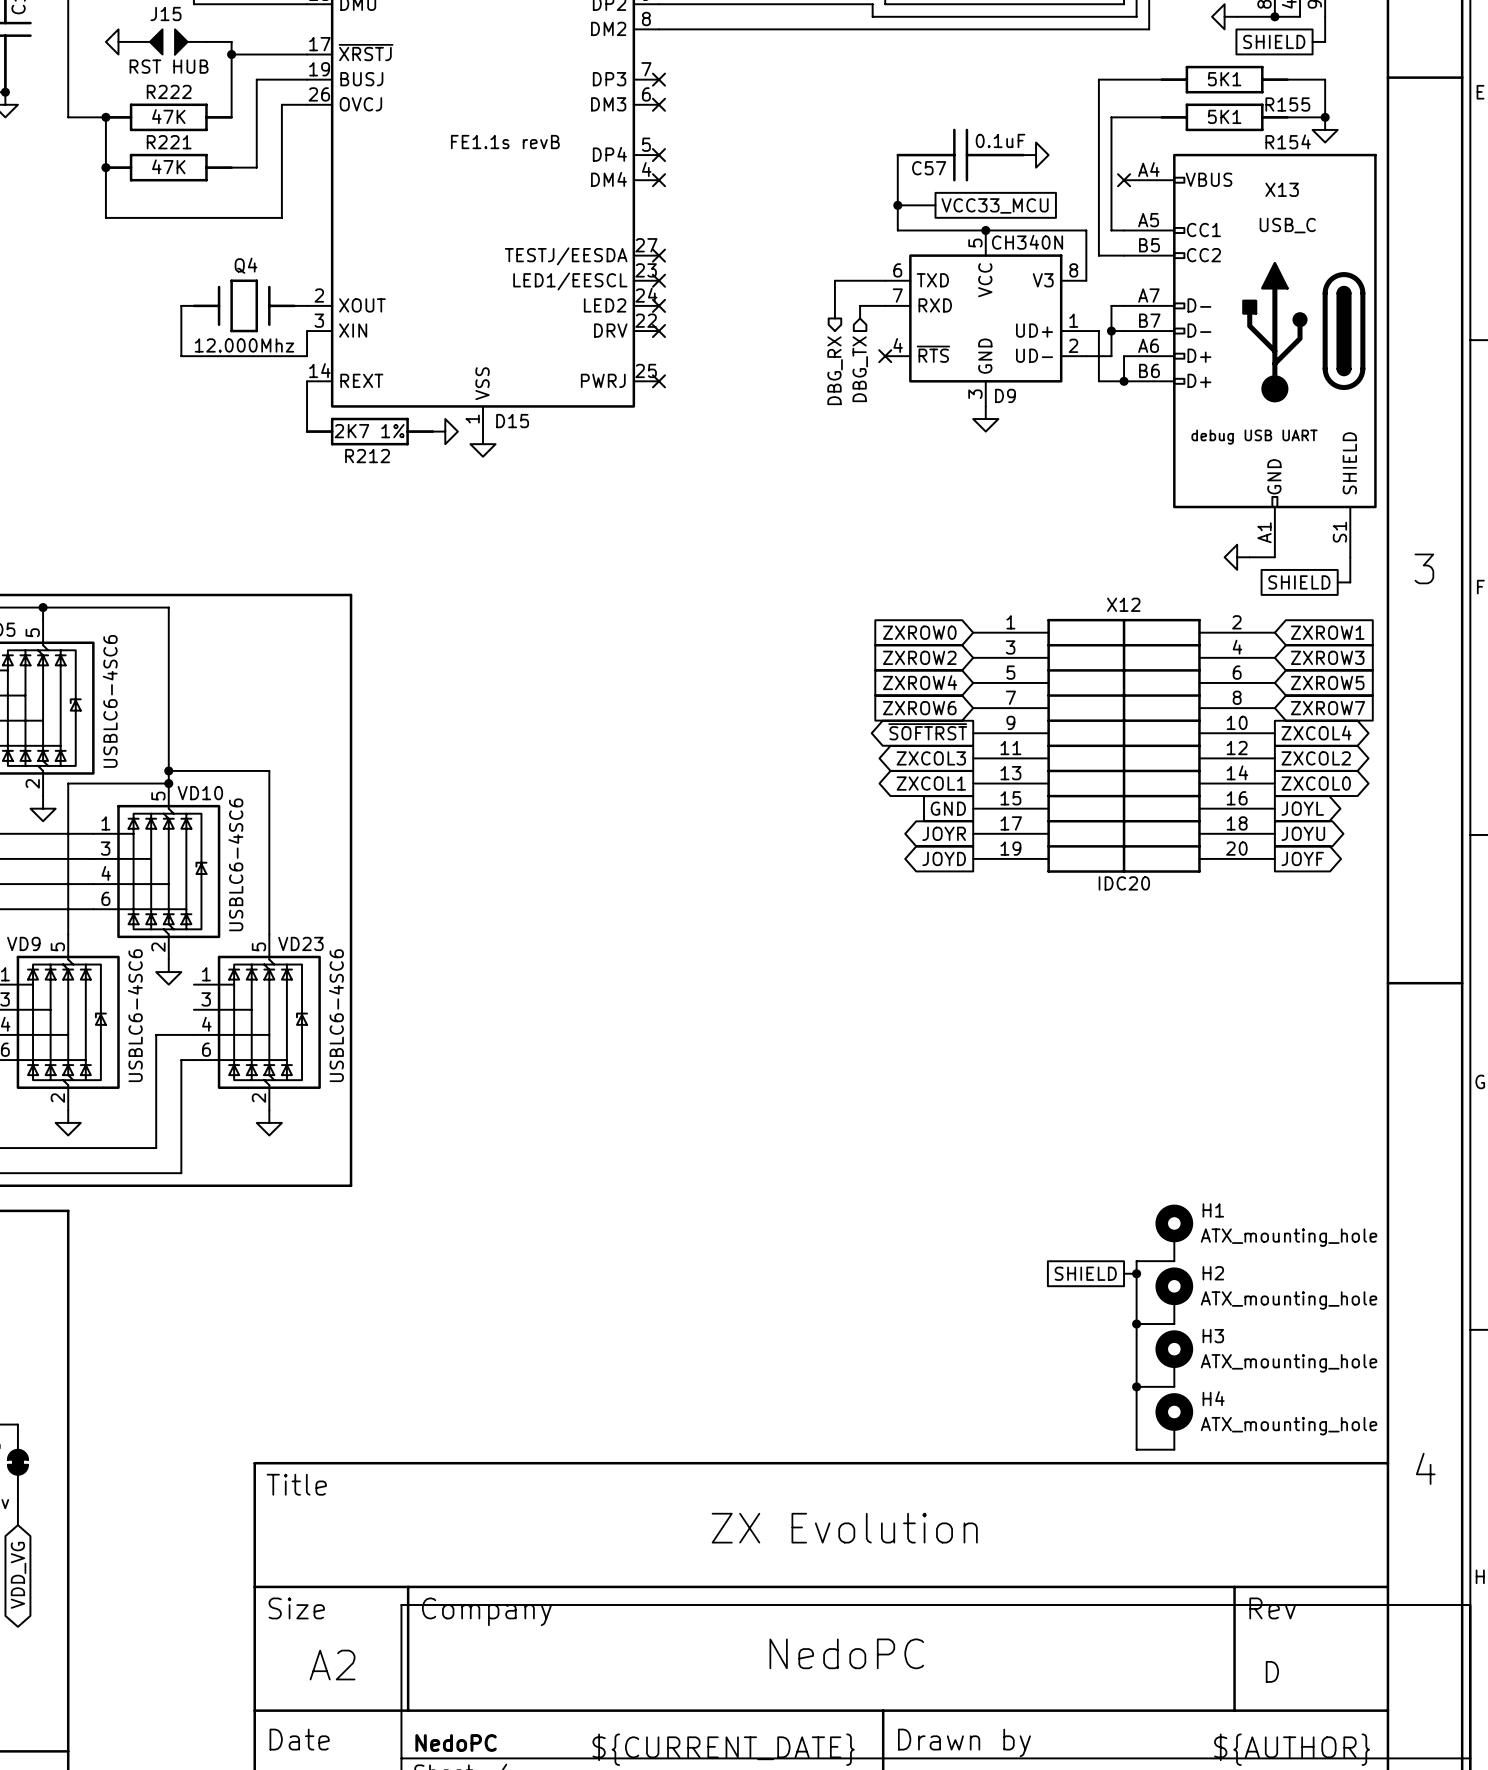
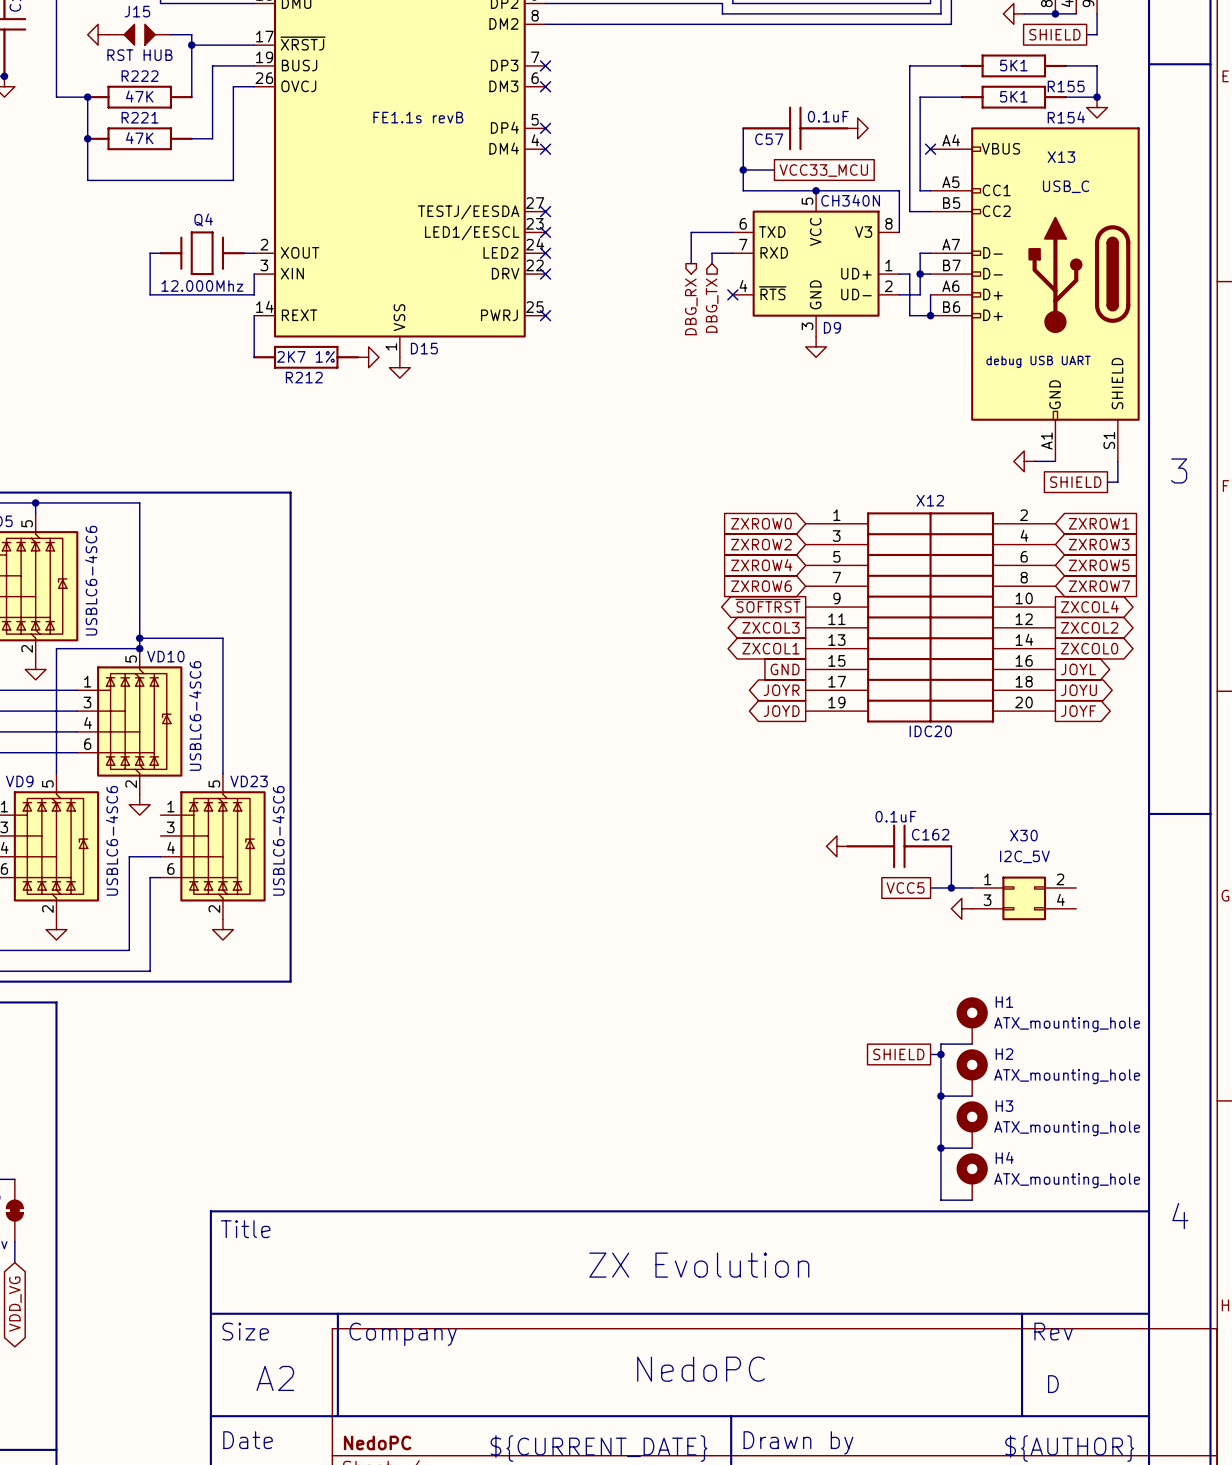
power symbol: none -> (836, 846)
C162: none -> 0.1uF (899, 846)
wire: none -> (951, 846) (951, 887)
global label: none -> VCC5 (905, 887)
wire: none -> (930, 887) (972, 887)
junction: none -> (951, 887)
X30: none -> I2C_5V (1024, 898)
power symbol: none -> (961, 908)

